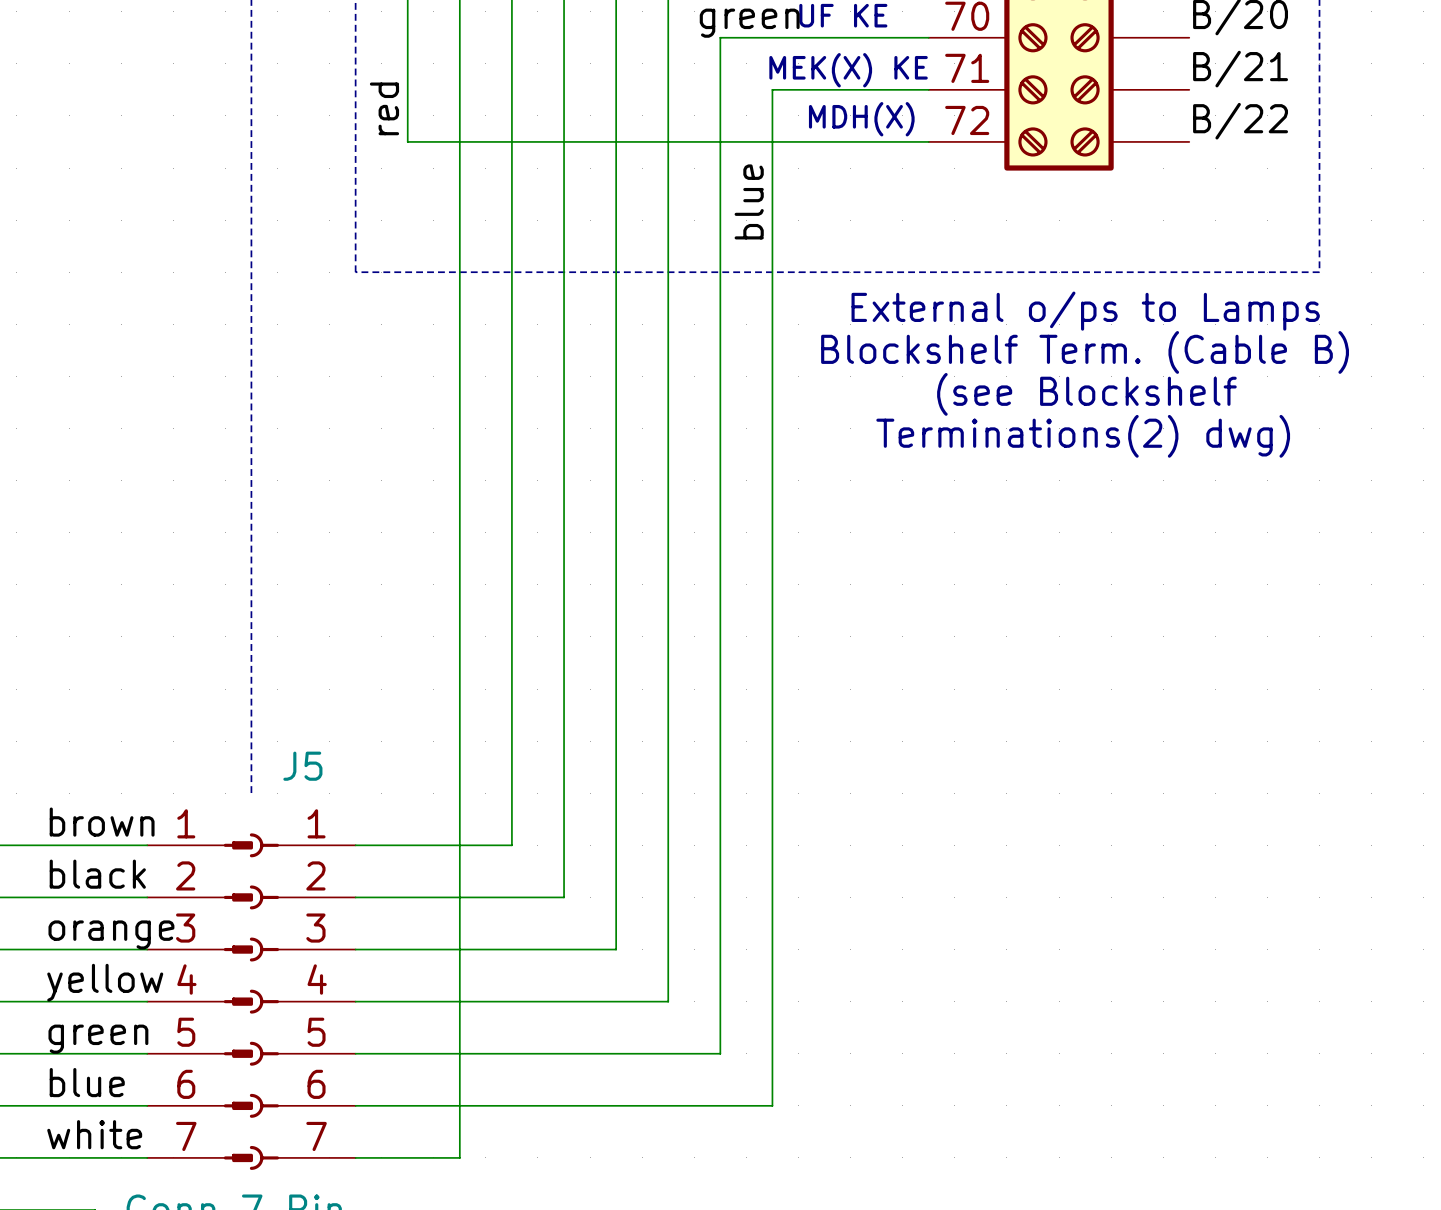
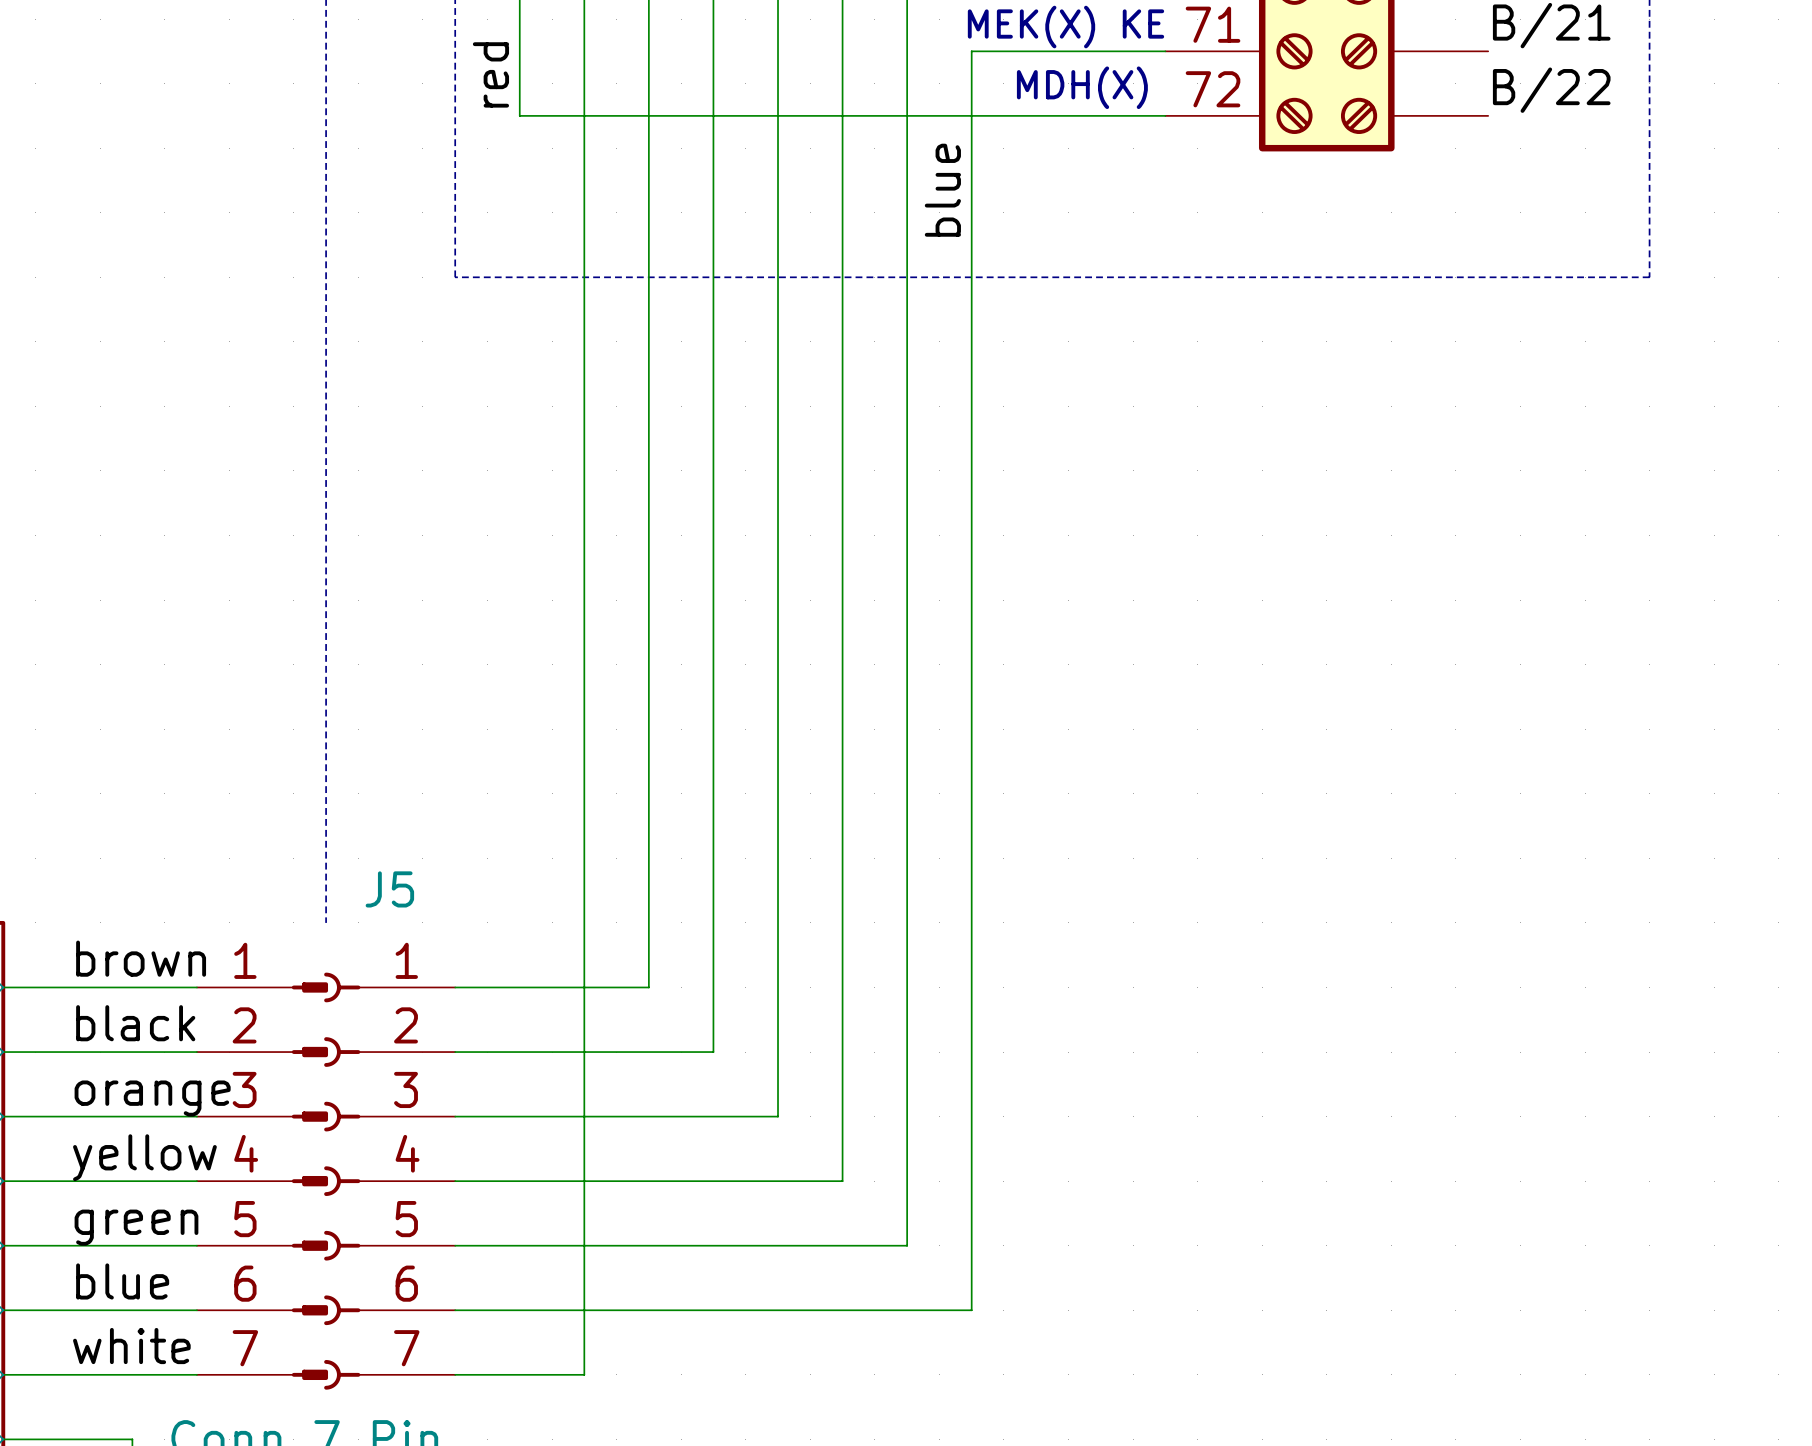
text: External o/ps to Lamps (1085, 311) -> none
text: Blockshelf Term. (Cable B) (1085, 352) -> none
text: (see Blockshelf (1086, 394) -> none
text: Terminations(2) dwg) (1083, 436) -> none

